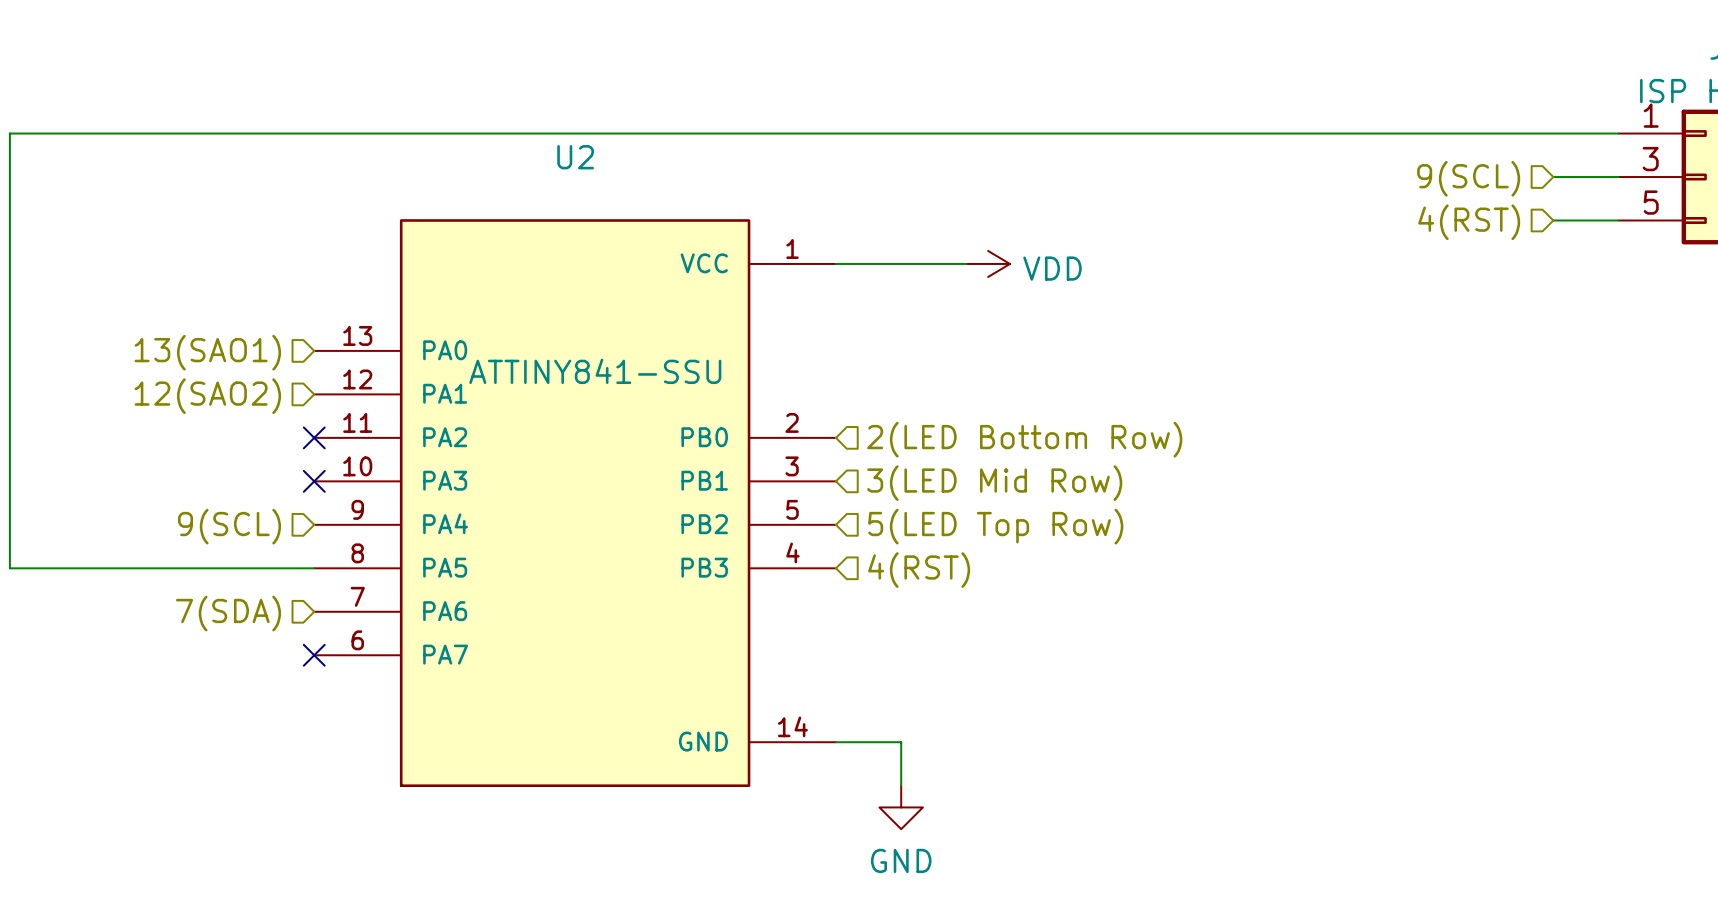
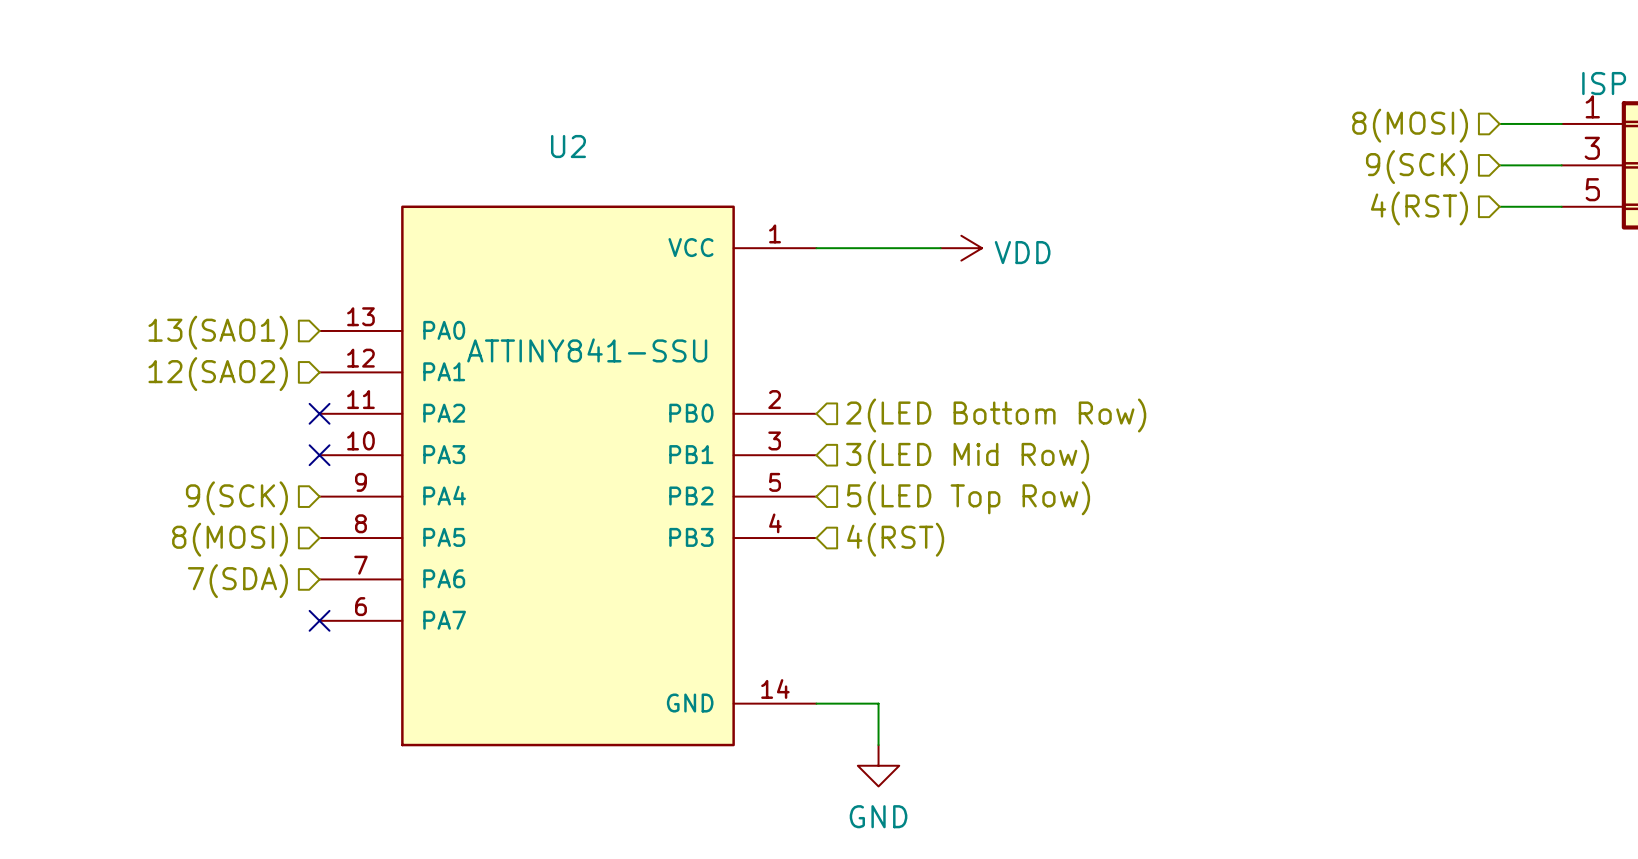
wire: (1553, 133) (9, 133) (9, 568) (314, 568) -> none
hierarchical label: none -> 8(MOSI) (1410, 125)
hierarchical label: 9(SCL) (1468, 178) -> 9(SCK) (1416, 167)
hierarchical label: 9(SCL) (229, 526) -> 9(SCK) (236, 498)
hierarchical label: none -> 8(MOSI) (230, 539)

